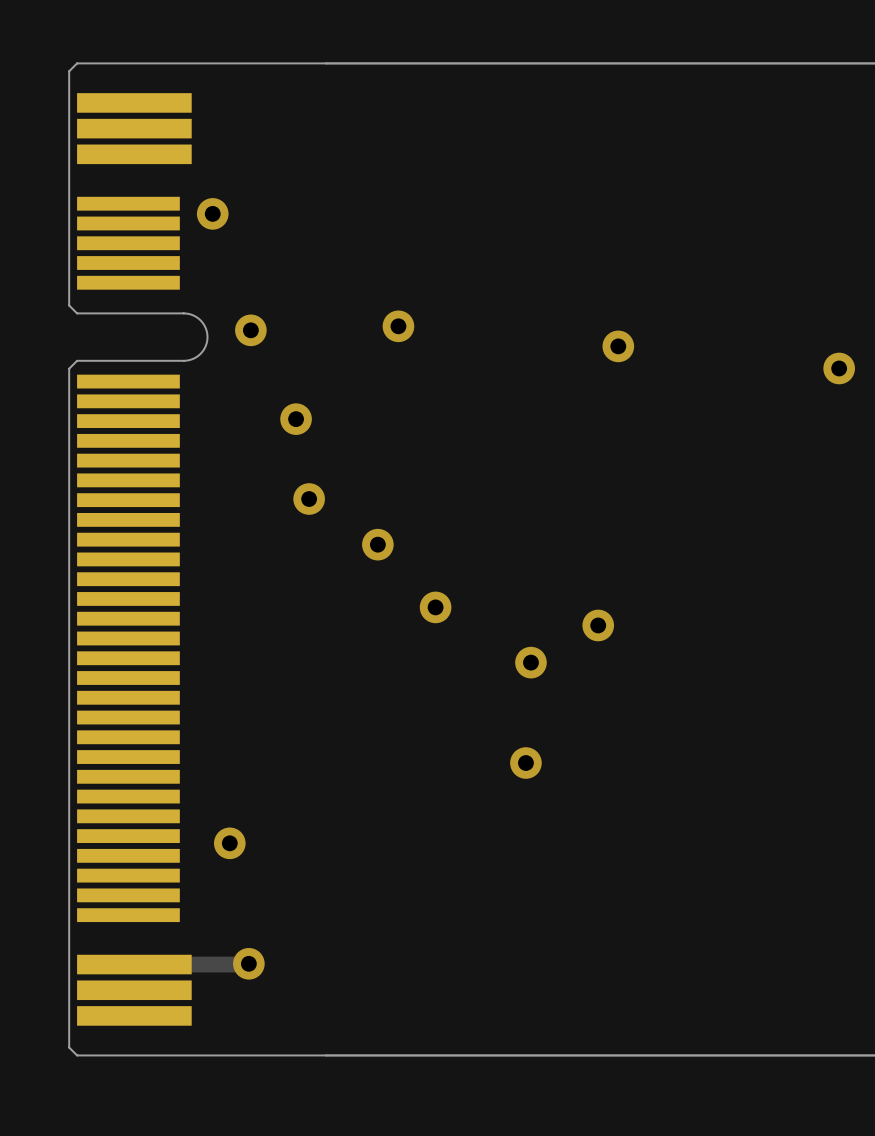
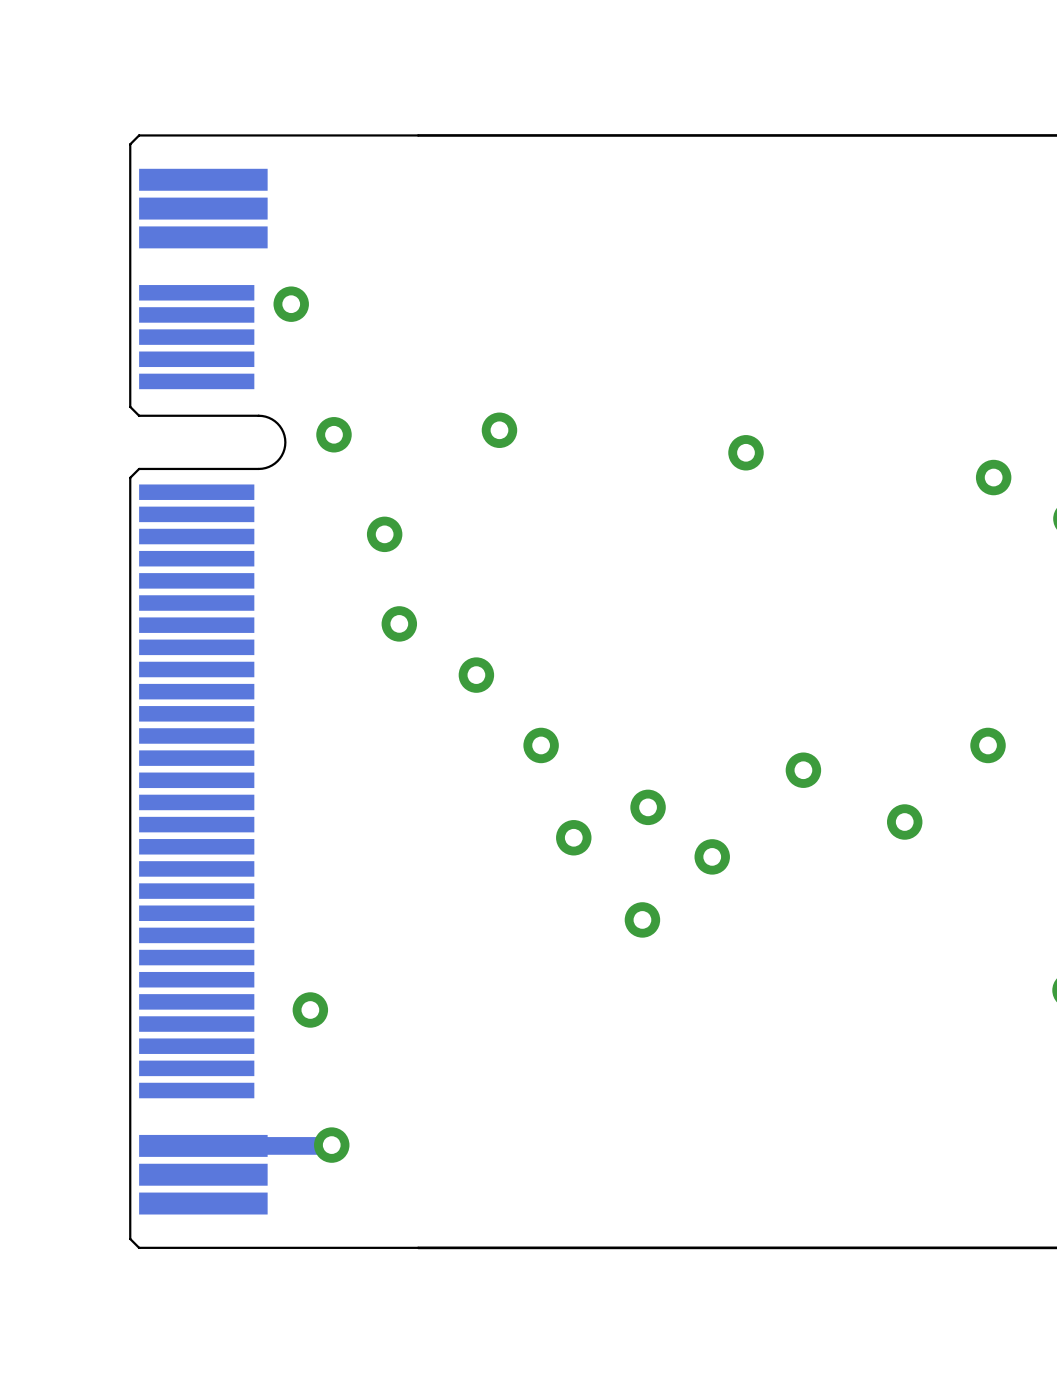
via: none -> (988, 745)
via: (598, 625) -> none
via: none -> (803, 770)
via: none -> (904, 822)
via: none -> (573, 837)
via: none -> (712, 856)

